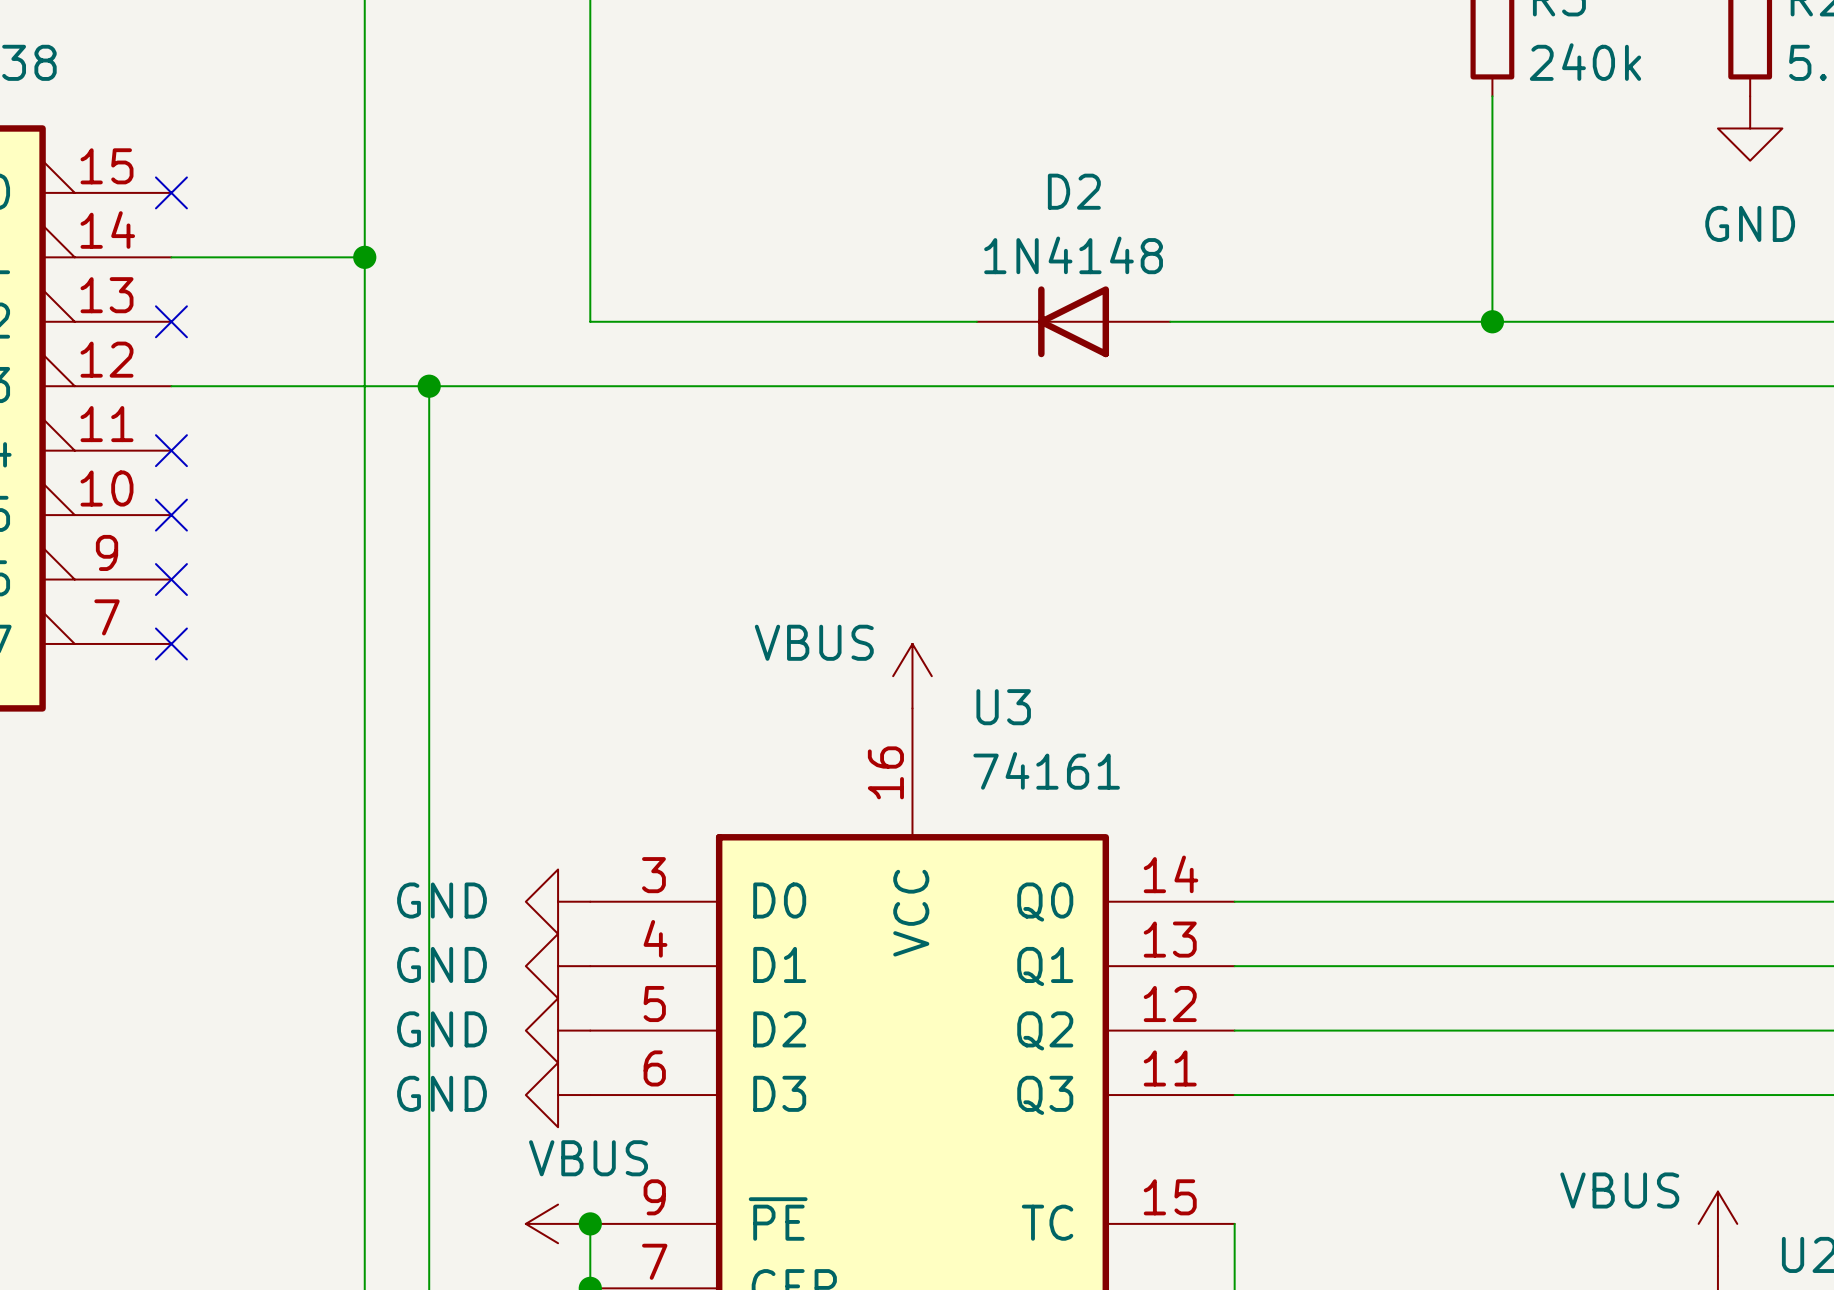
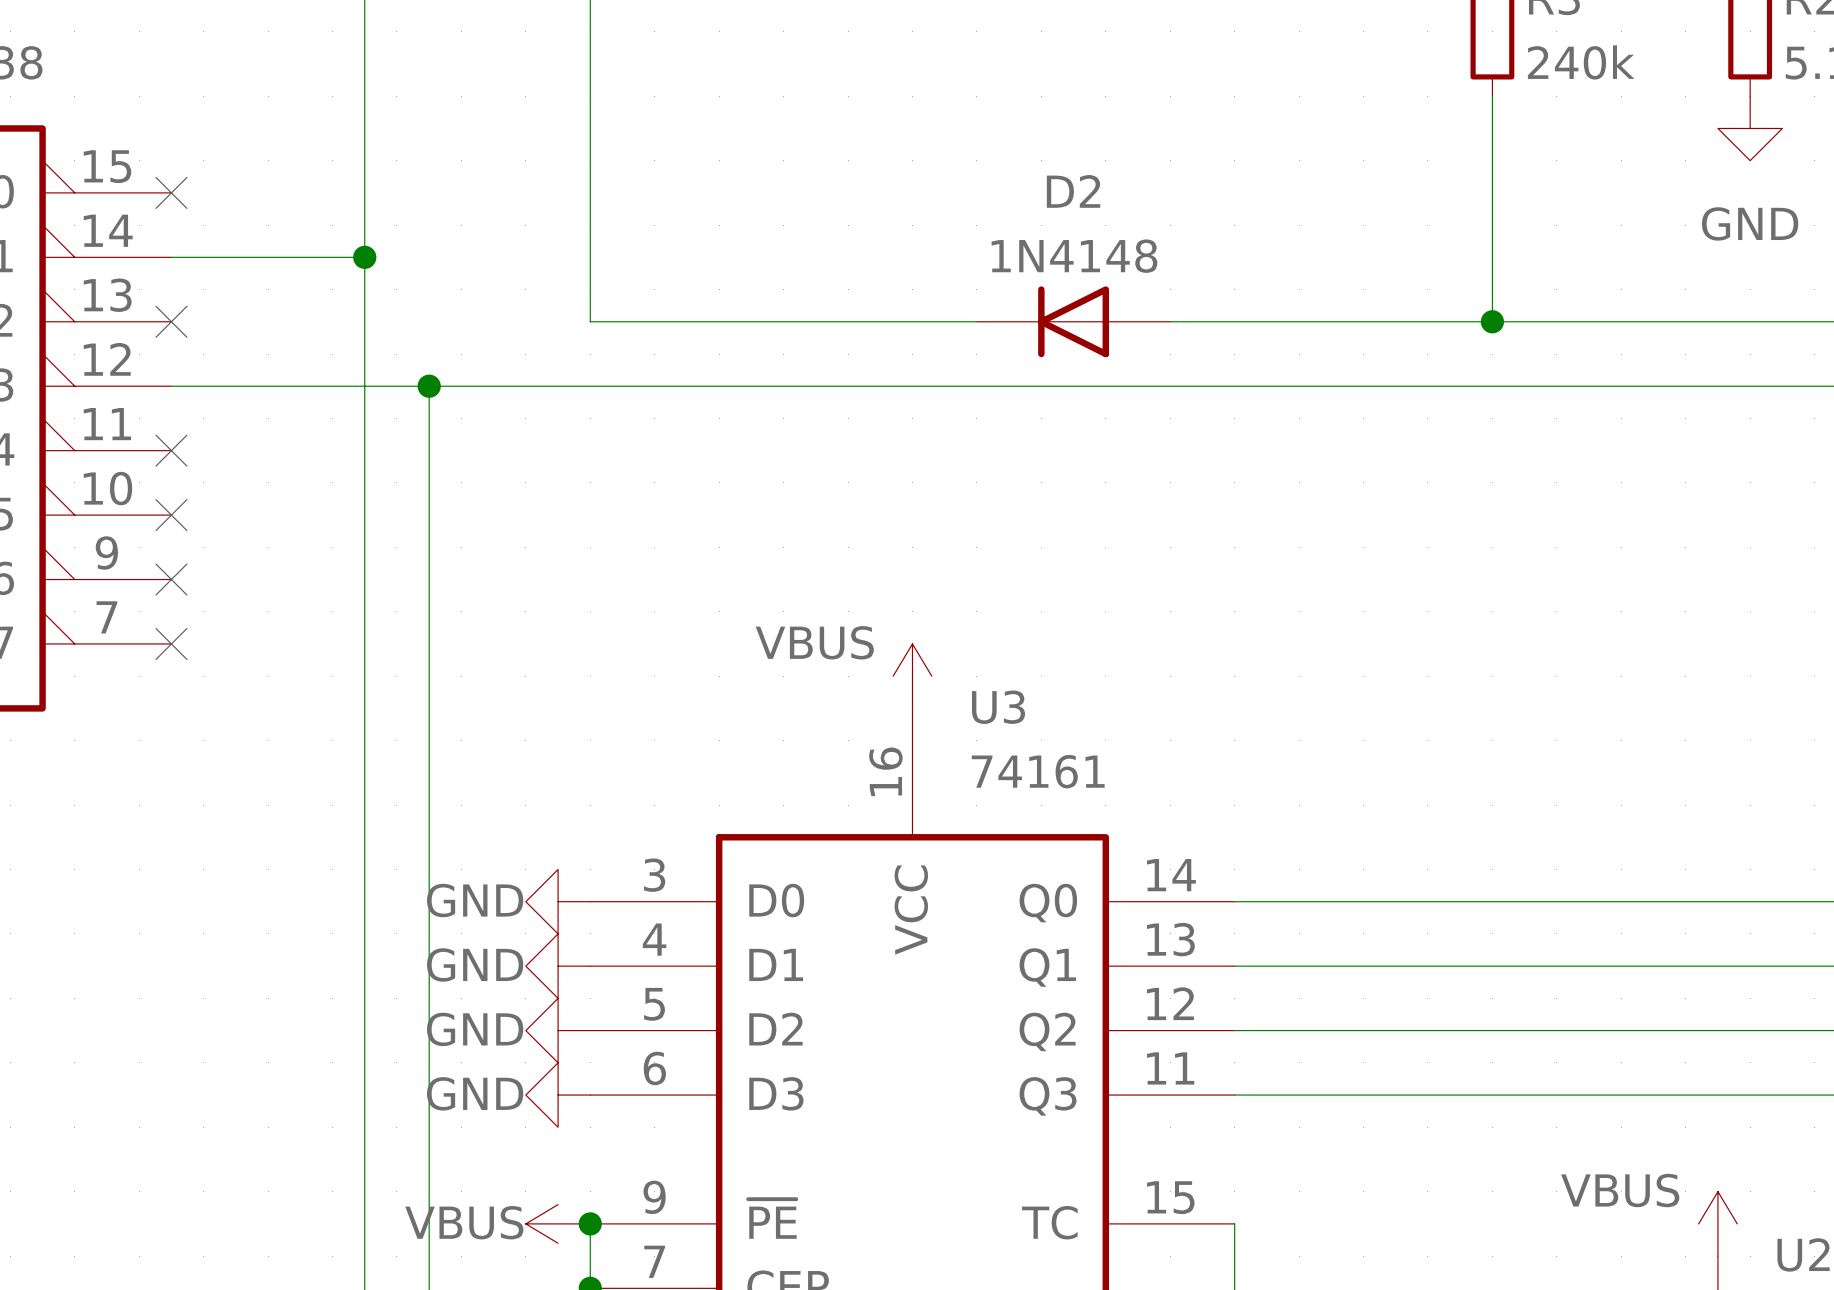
power symbol text position: GND (441, 900) -> GND (475, 900)
power symbol text position: GND (441, 964) -> GND (475, 964)
power symbol text position: GND (441, 1029) -> GND (475, 1029)
power symbol text position: GND (441, 1093) -> GND (475, 1093)
power symbol text position: VBUS (588, 1158) -> VBUS (464, 1222)

